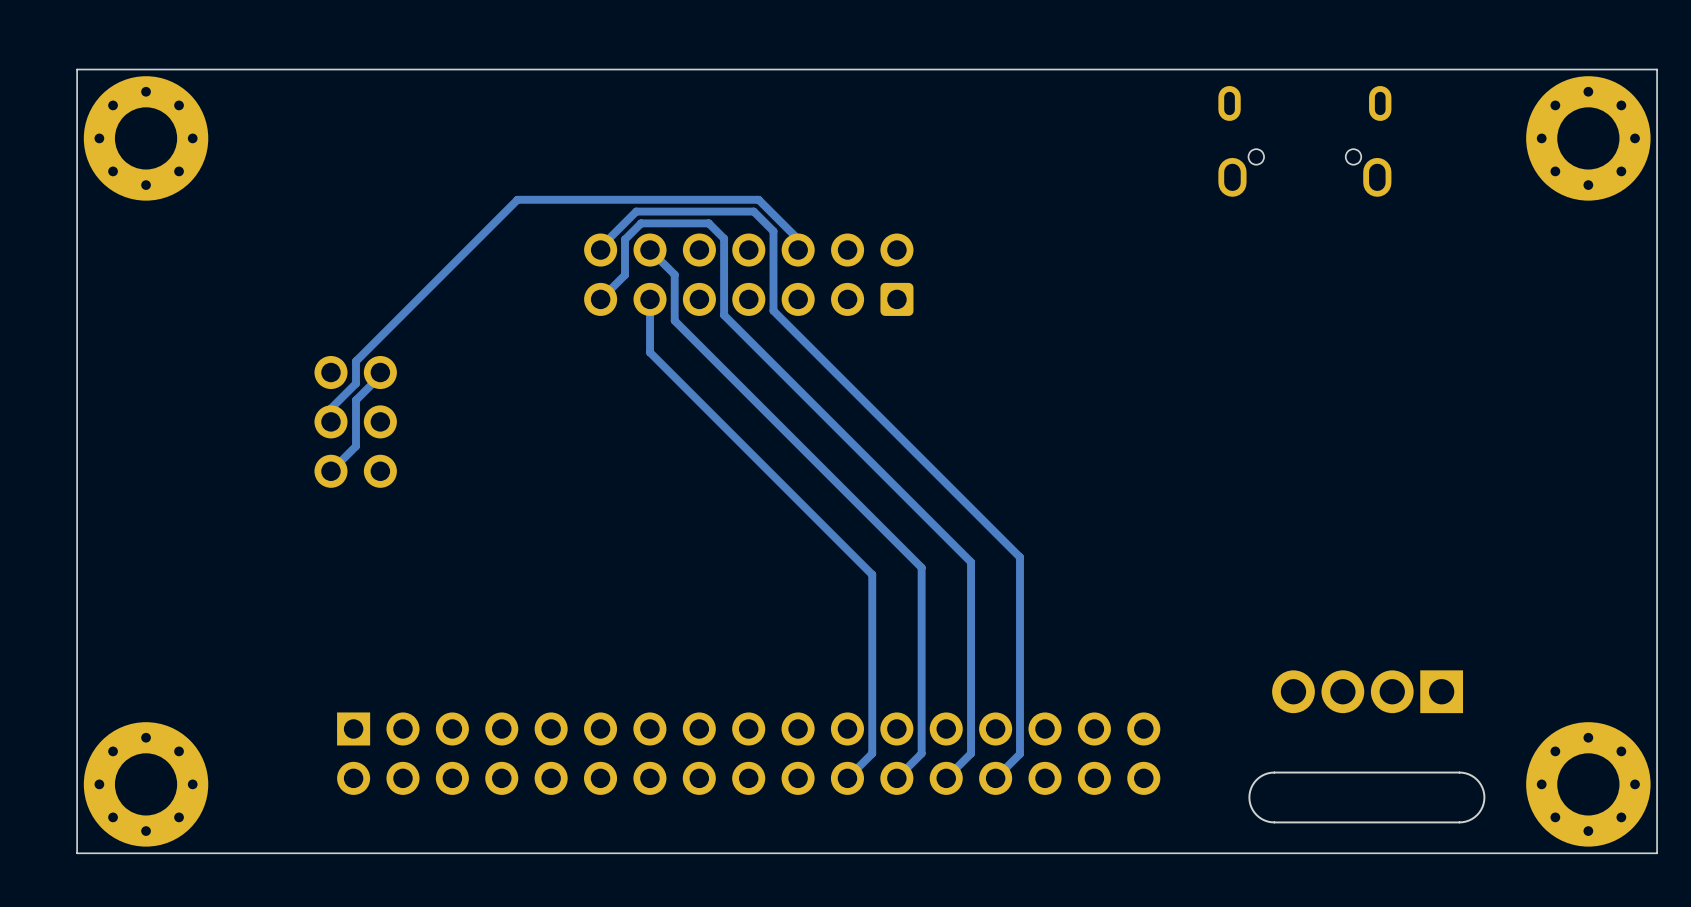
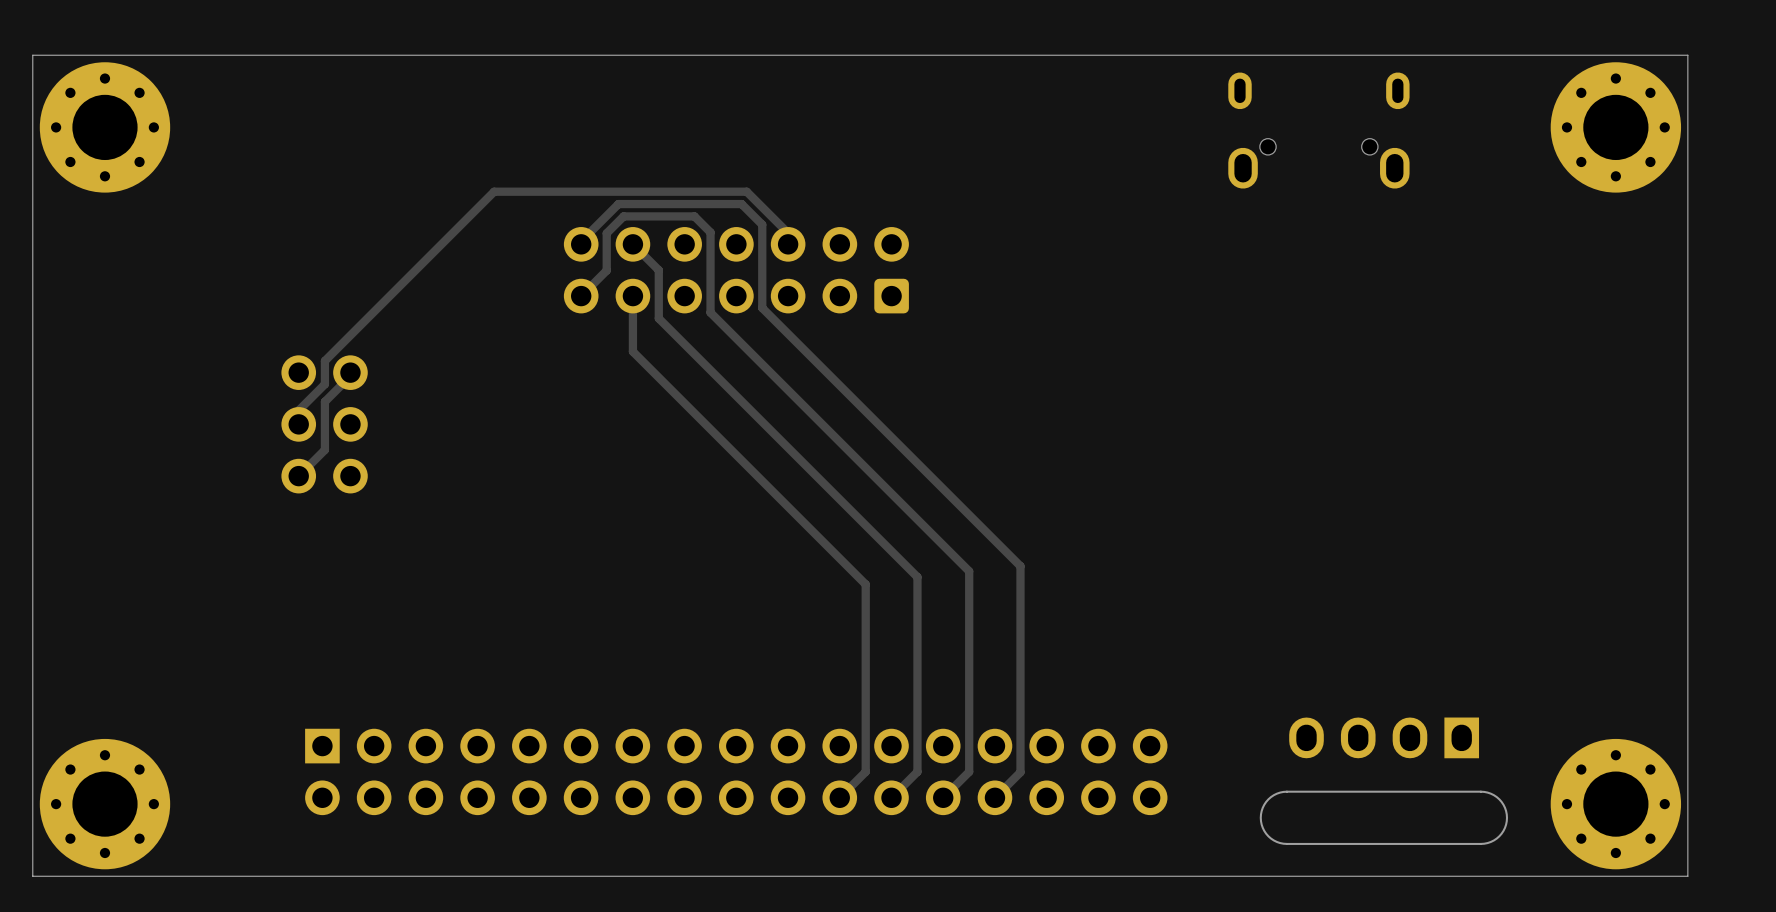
part: (1367, 691) -> none
part: none -> (1384, 737)

